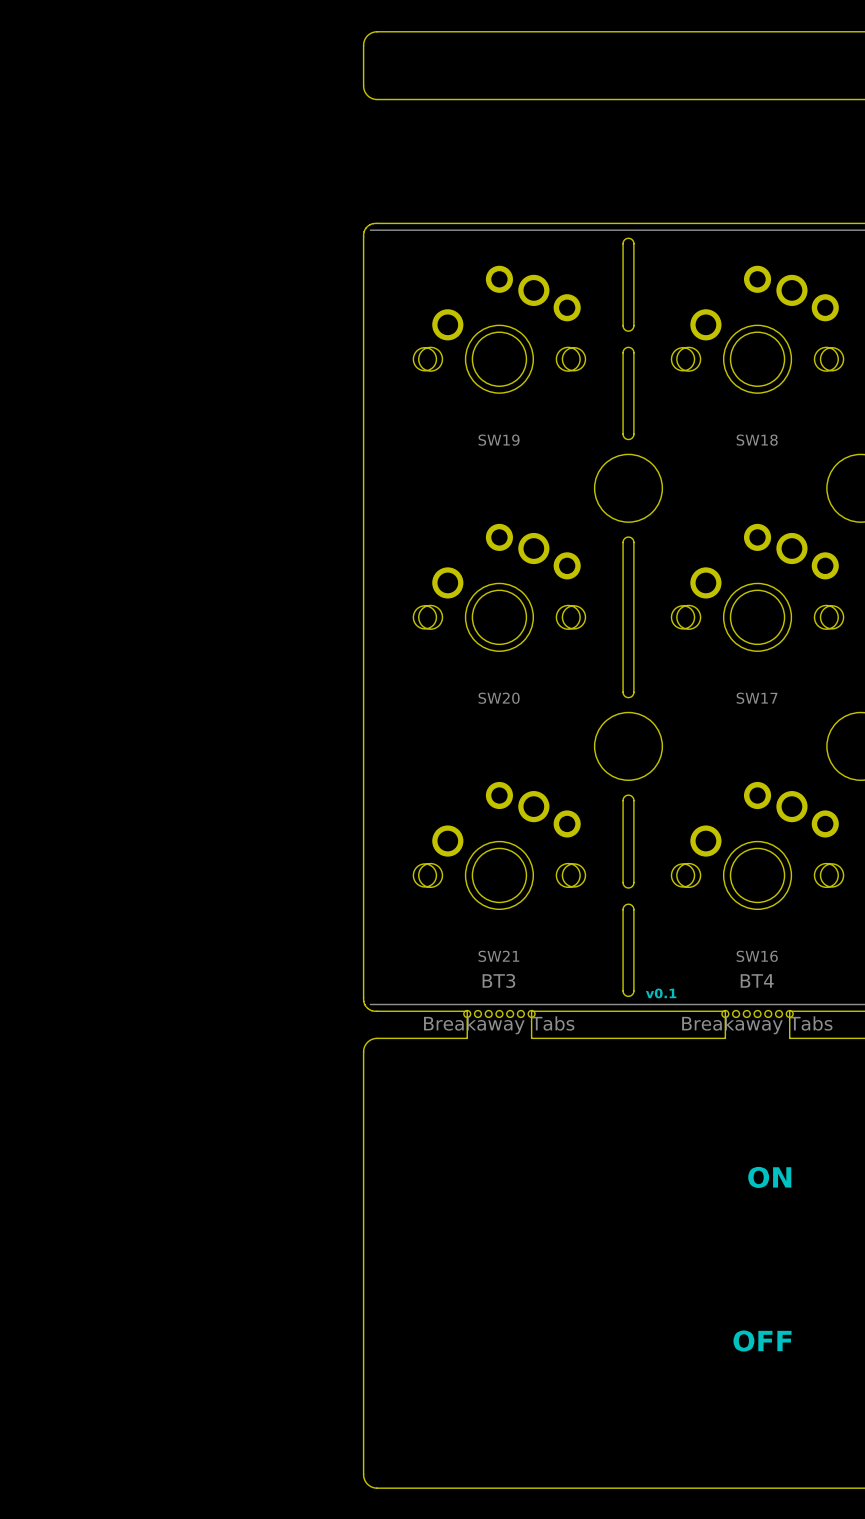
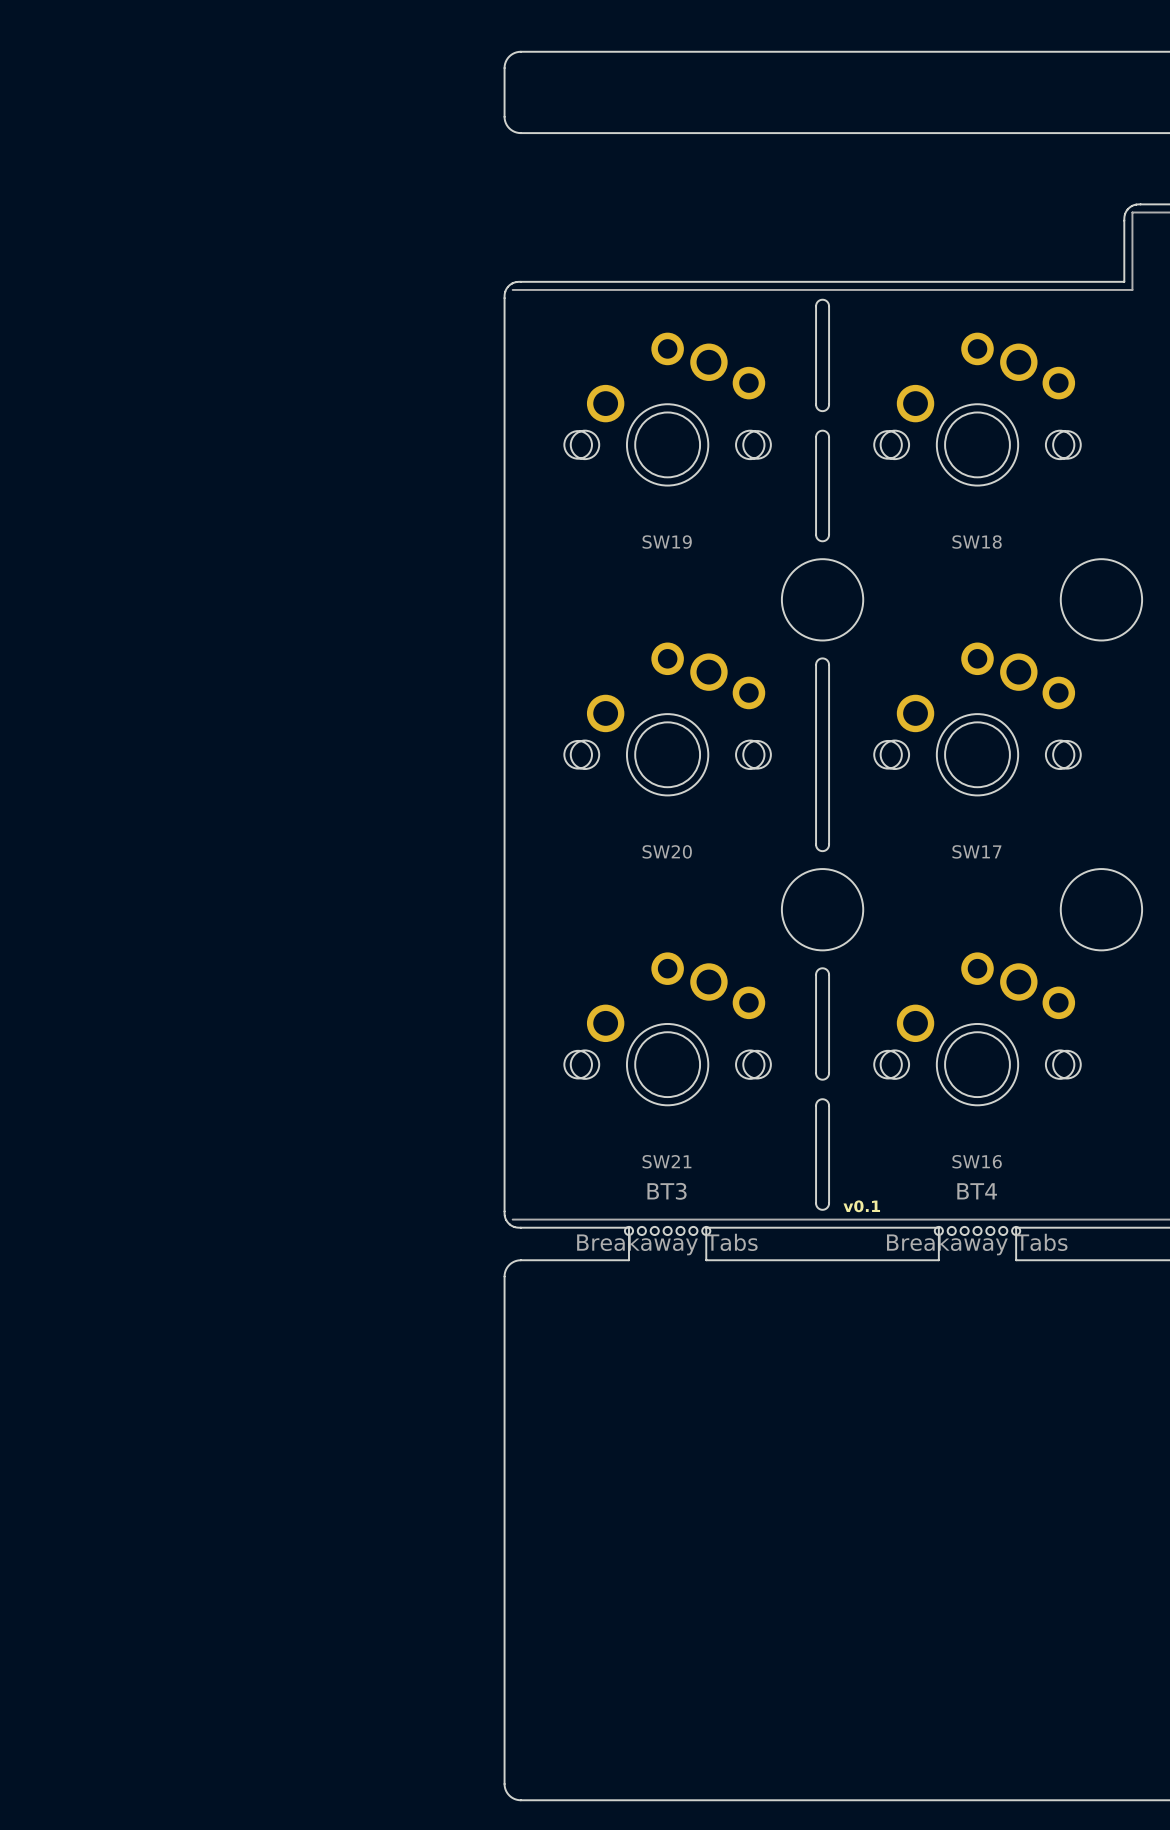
text: ON (769, 1177) -> none
text: OFF (762, 1341) -> none

